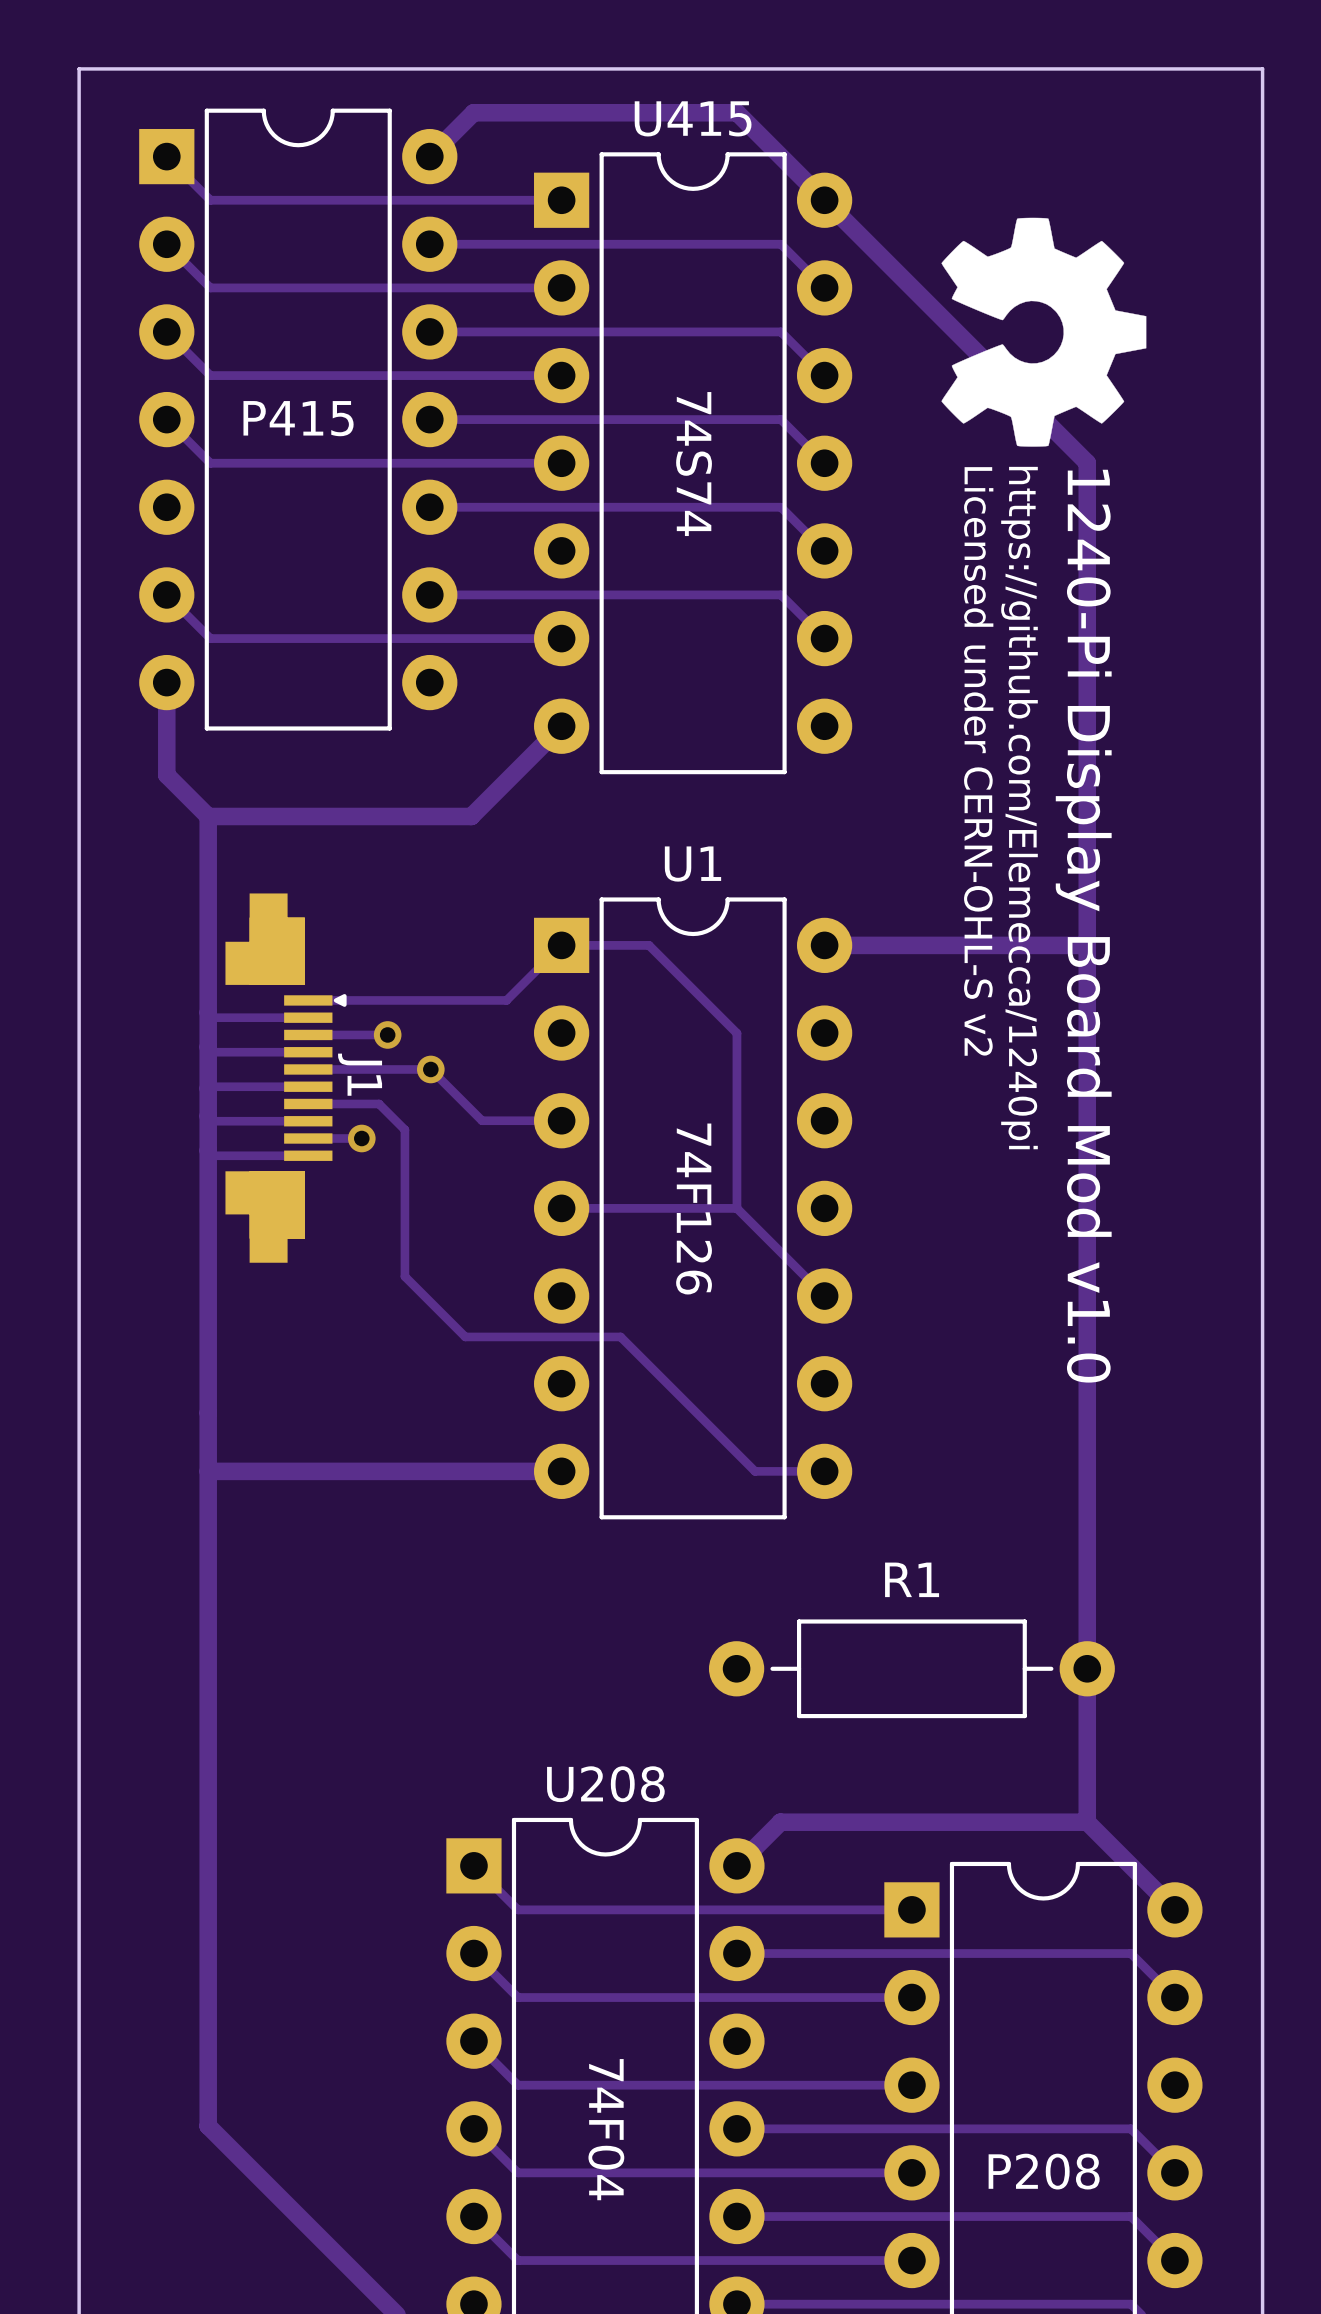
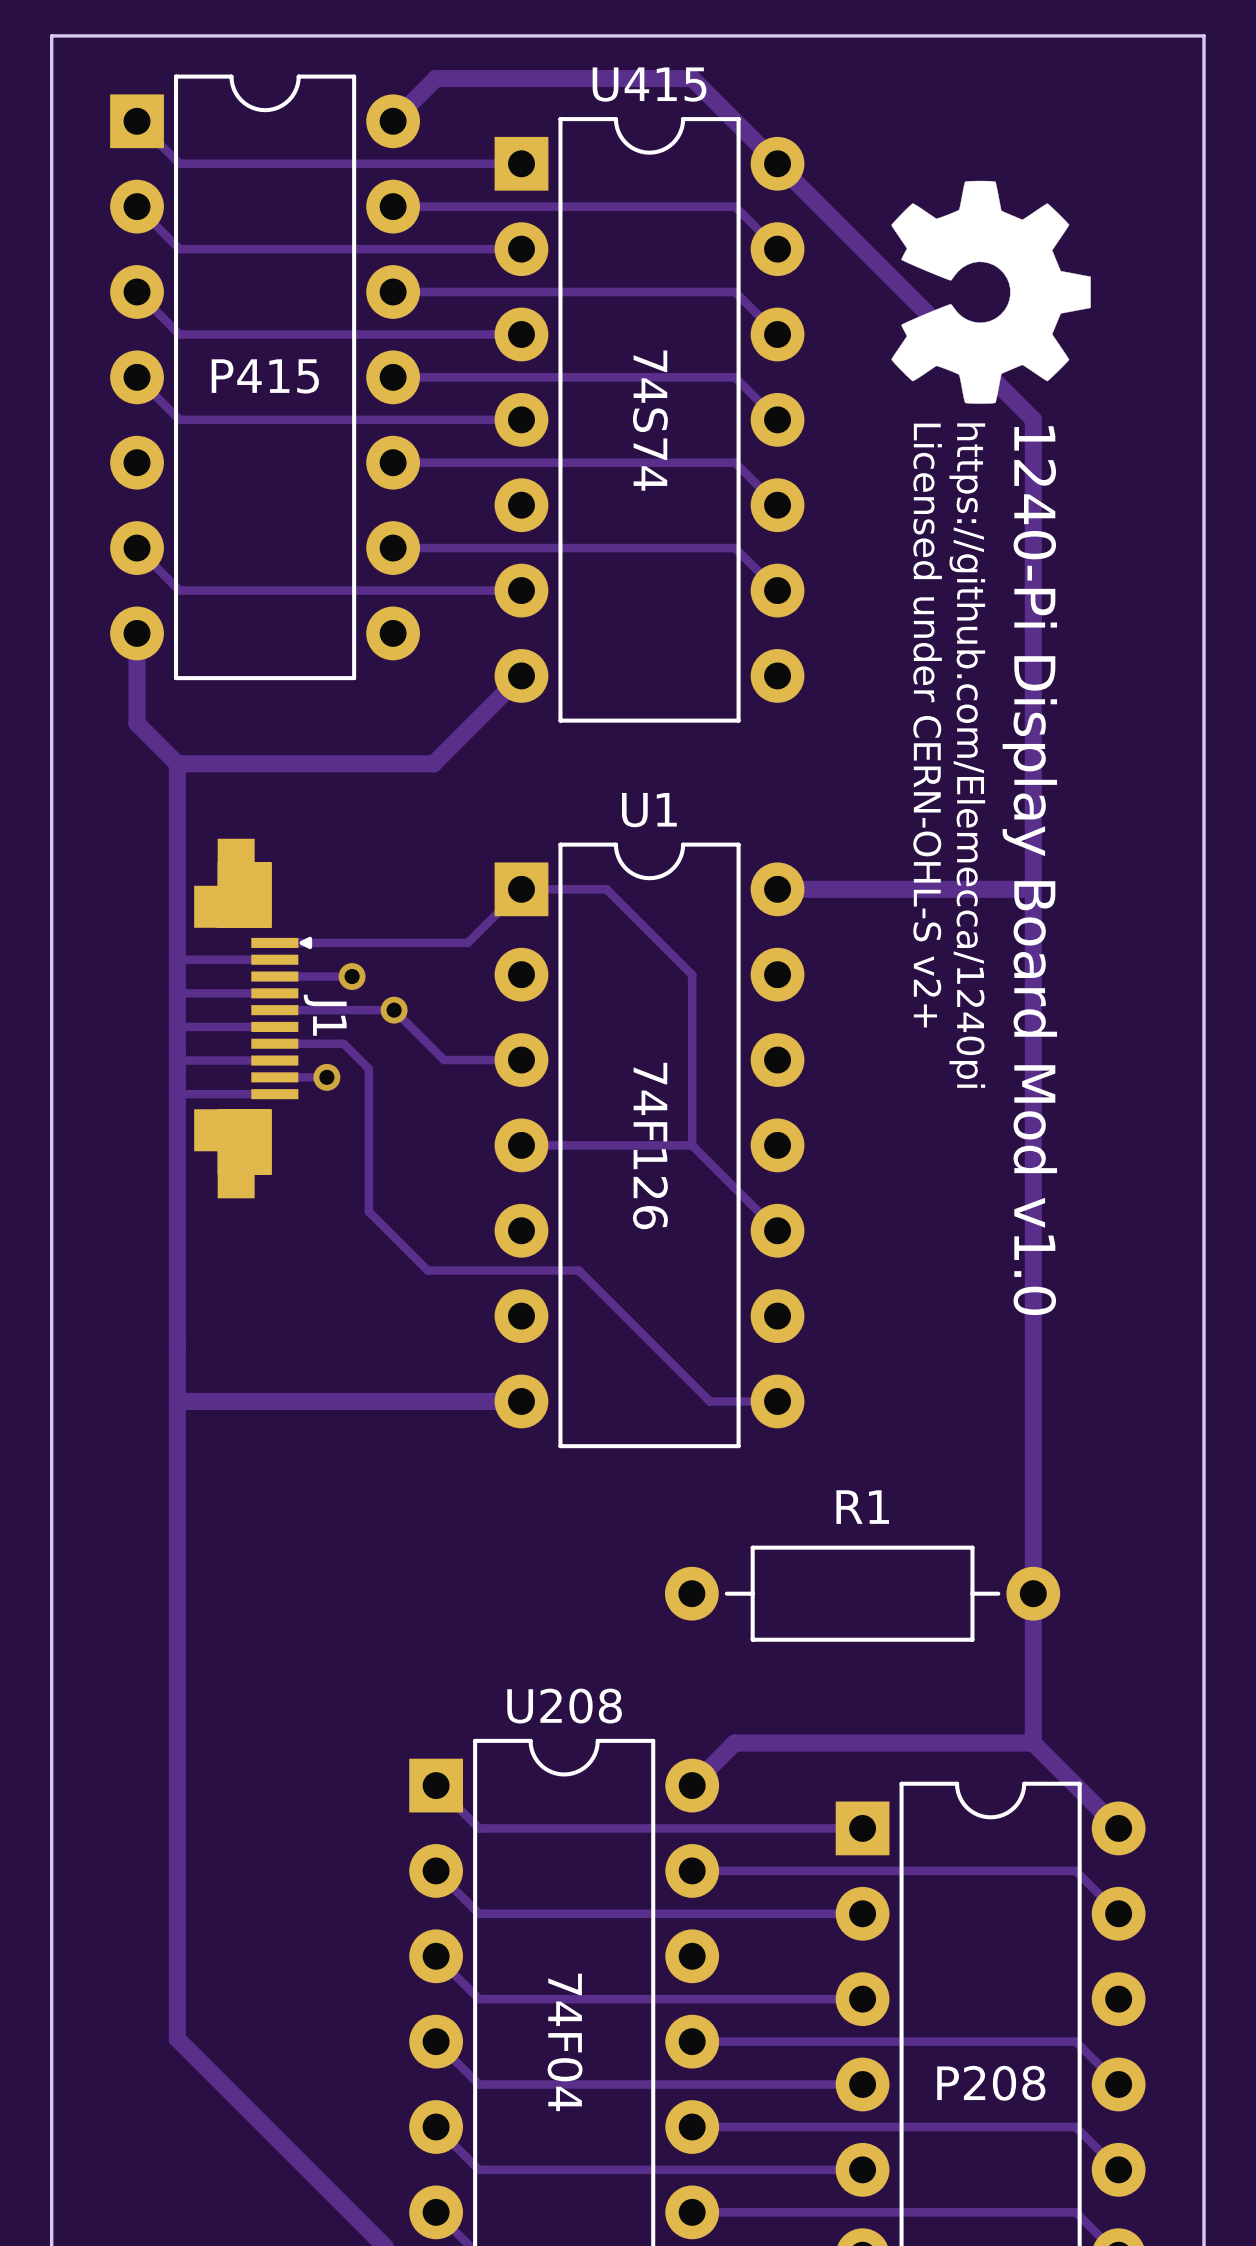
text: Licensed under CERN-OHL-S v2 (978, 761) -> Licensed under CERN-OHL-S v2+ (927, 725)

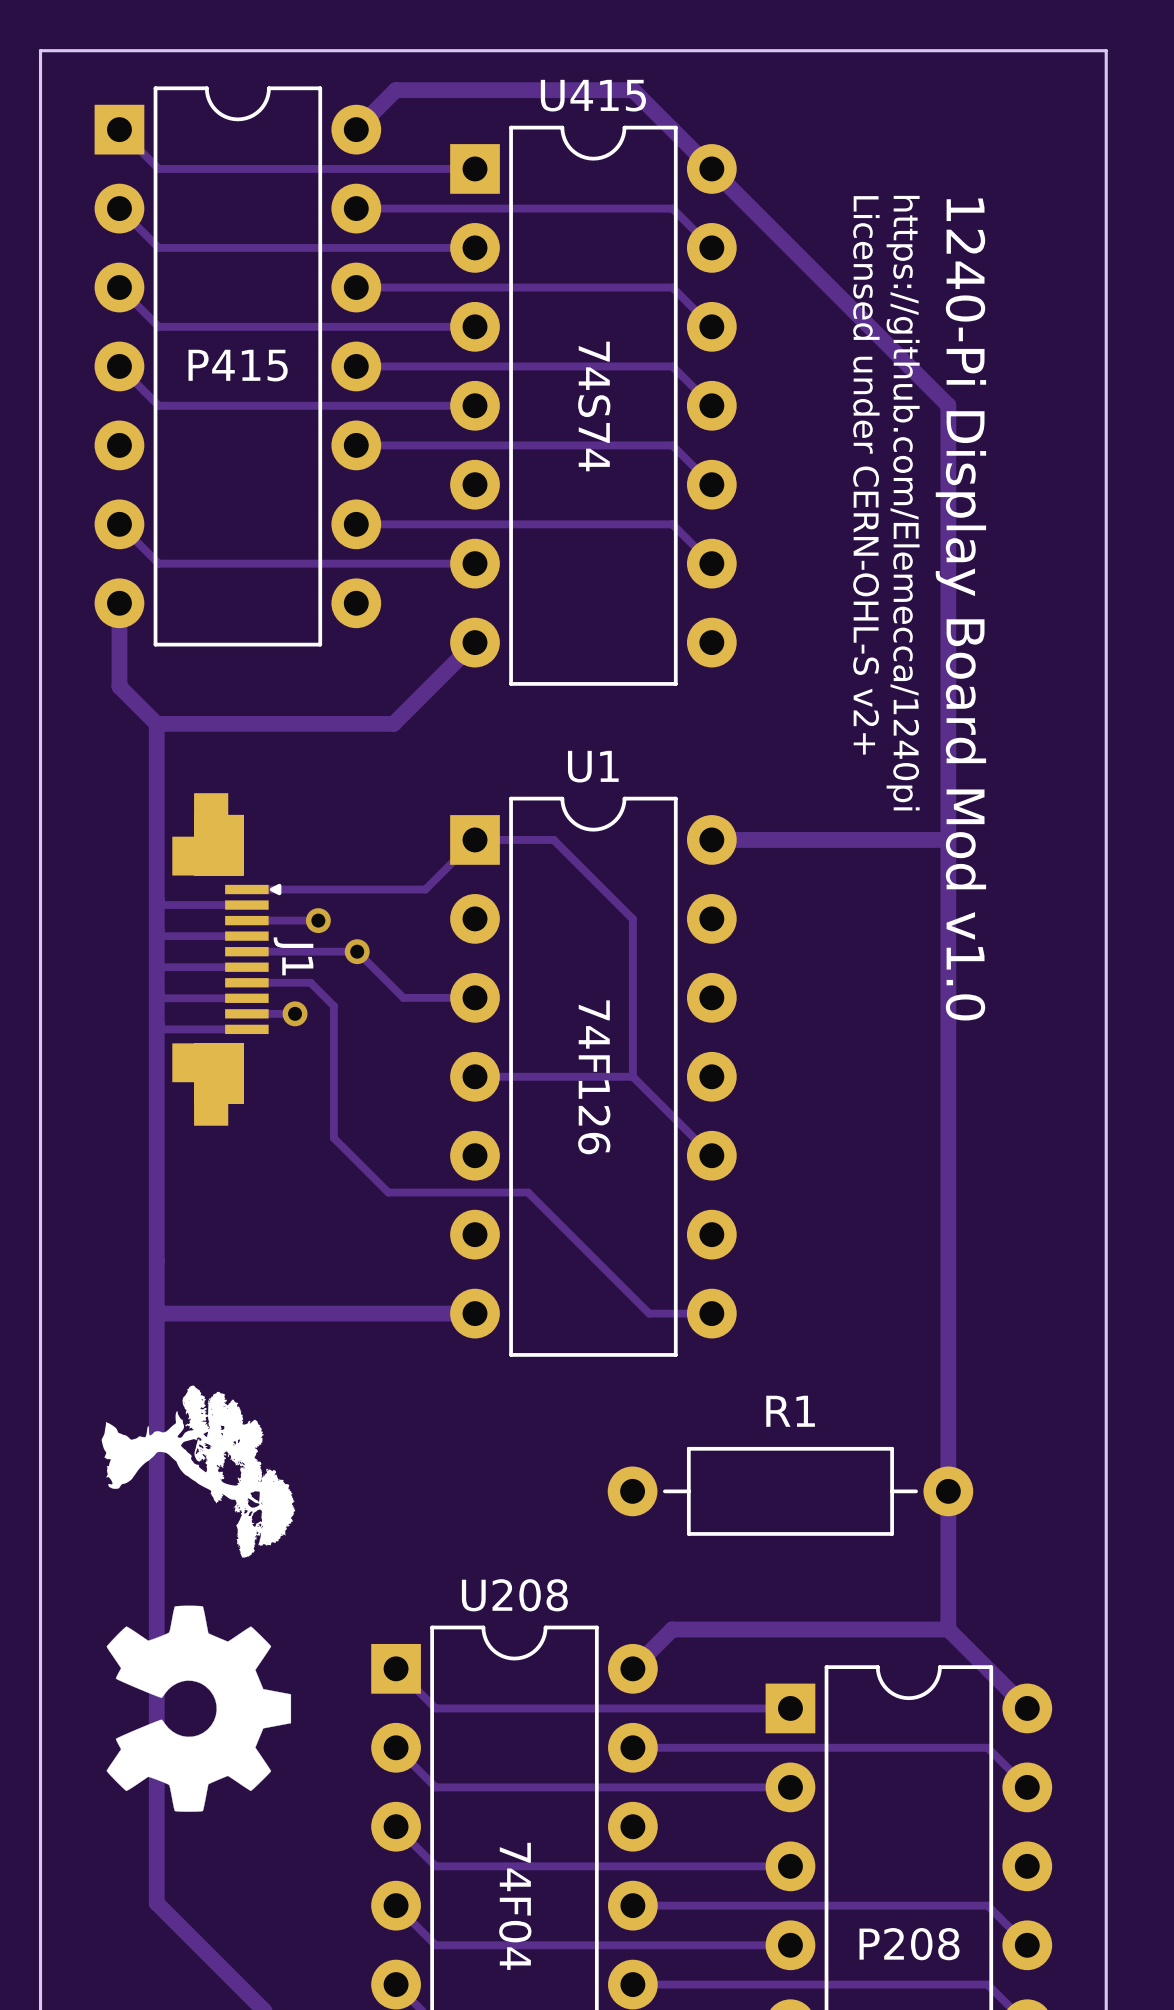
drawing: [891, 180, 1091, 404] -> none
text position: Licensed under CERN-OHL-S v2+ (927, 725) -> Licensed under CERN-OHL-S v2+ (866, 475)
text position: https://github.com/Elemecca/1240pi (967, 755) -> https://github.com/Elemecca/1240pi (903, 503)
text position: 1240-Pi Display Board Mod v1.0 (1029, 870) -> 1240-Pi Display Board Mod v1.0 (960, 609)
drawing: none -> [101, 1385, 296, 1558]
drawing: none -> [106, 1605, 292, 1812]

